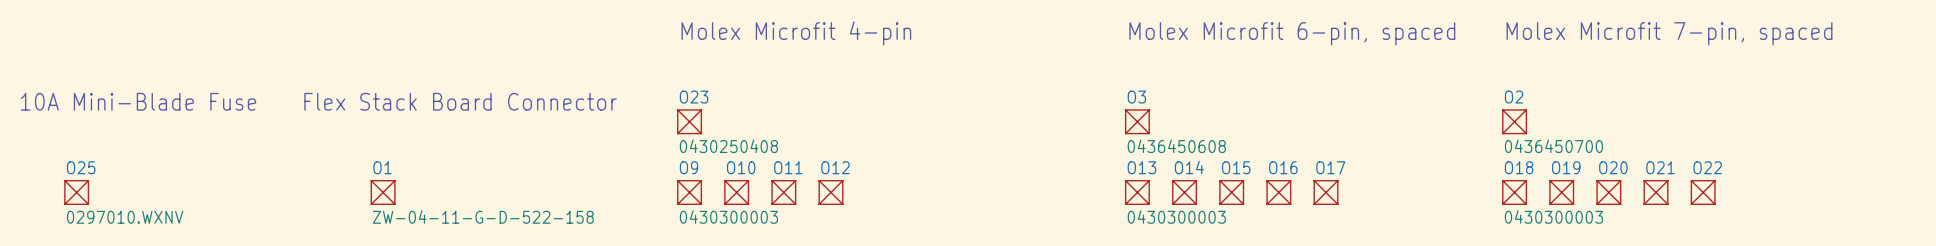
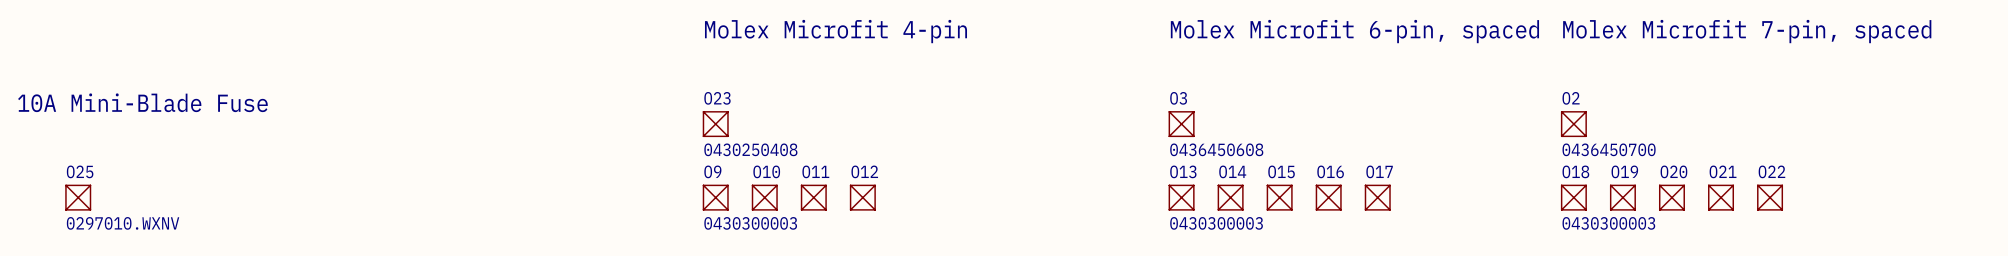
text: Flex Stack Board Connector (460, 101) -> none
O1: (383, 192) -> none

